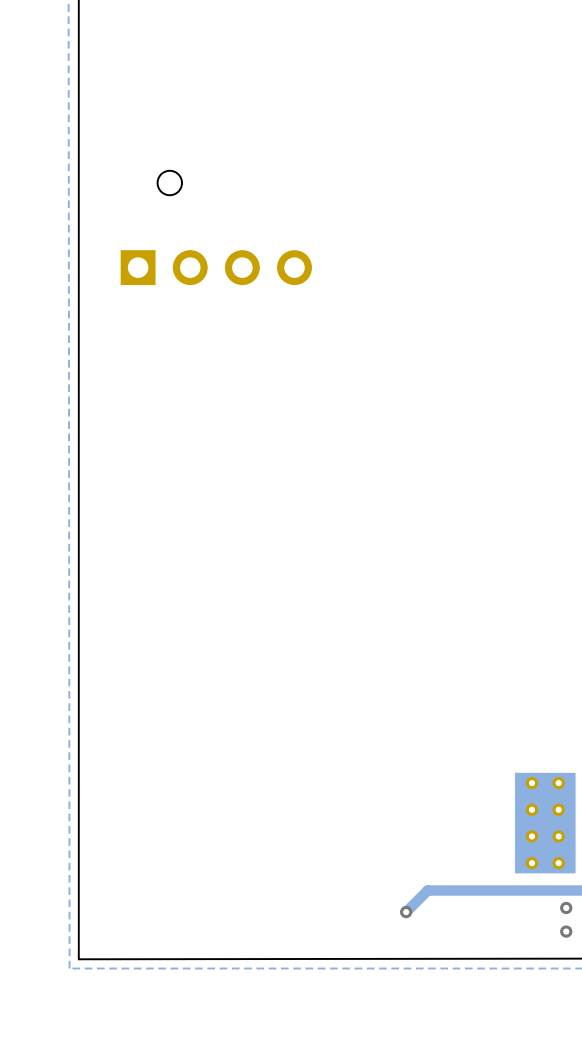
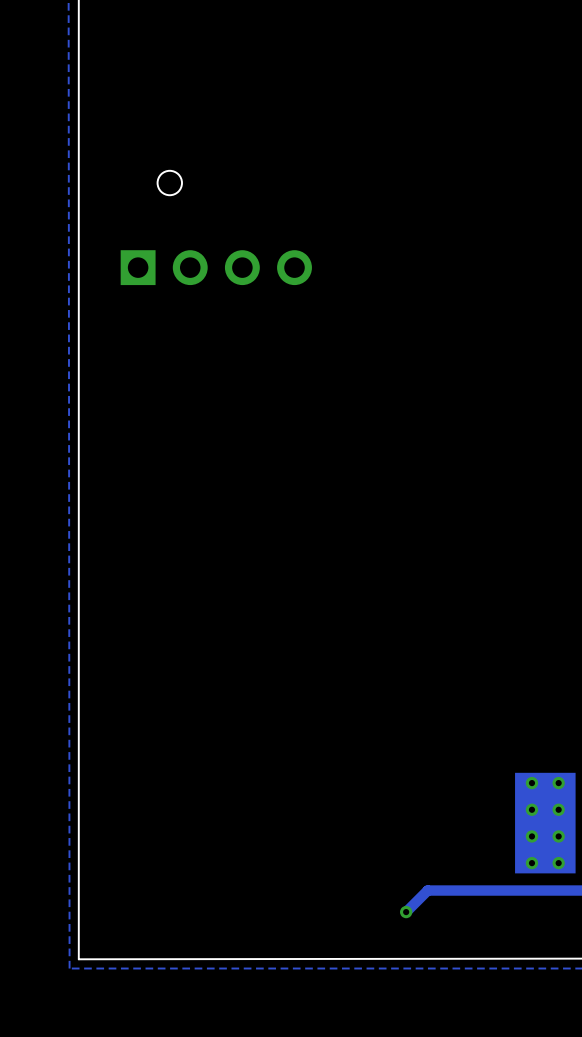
via: (566, 907) -> none
via: (566, 931) -> none

